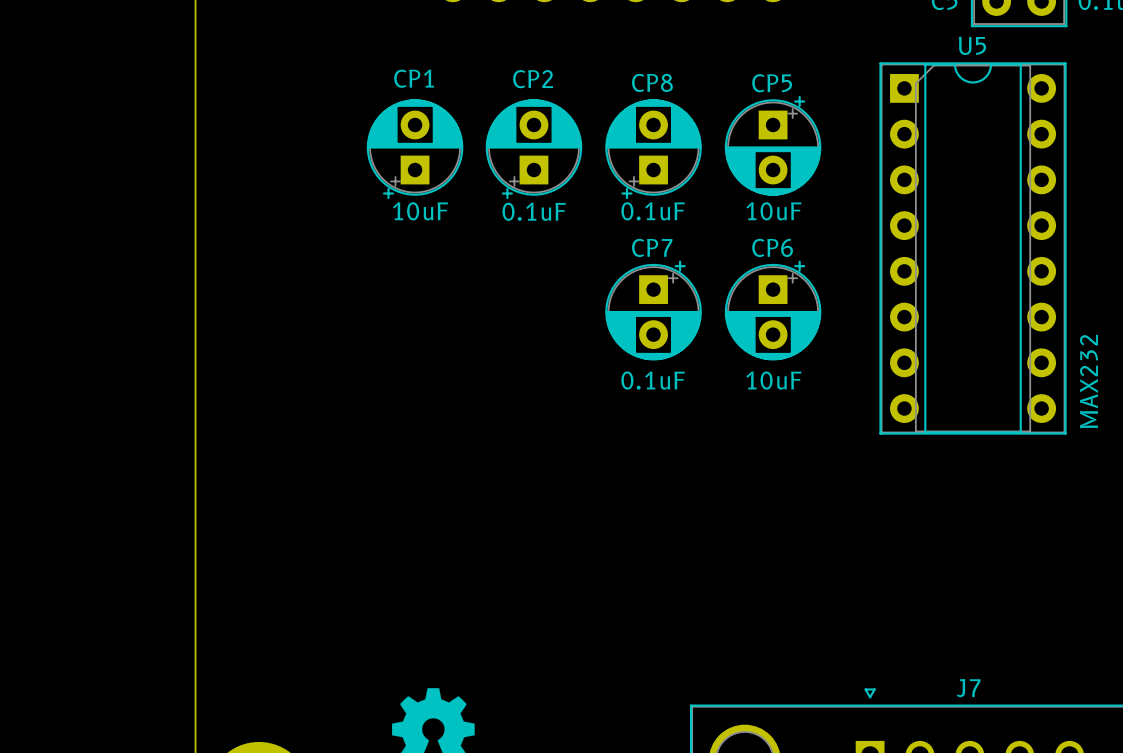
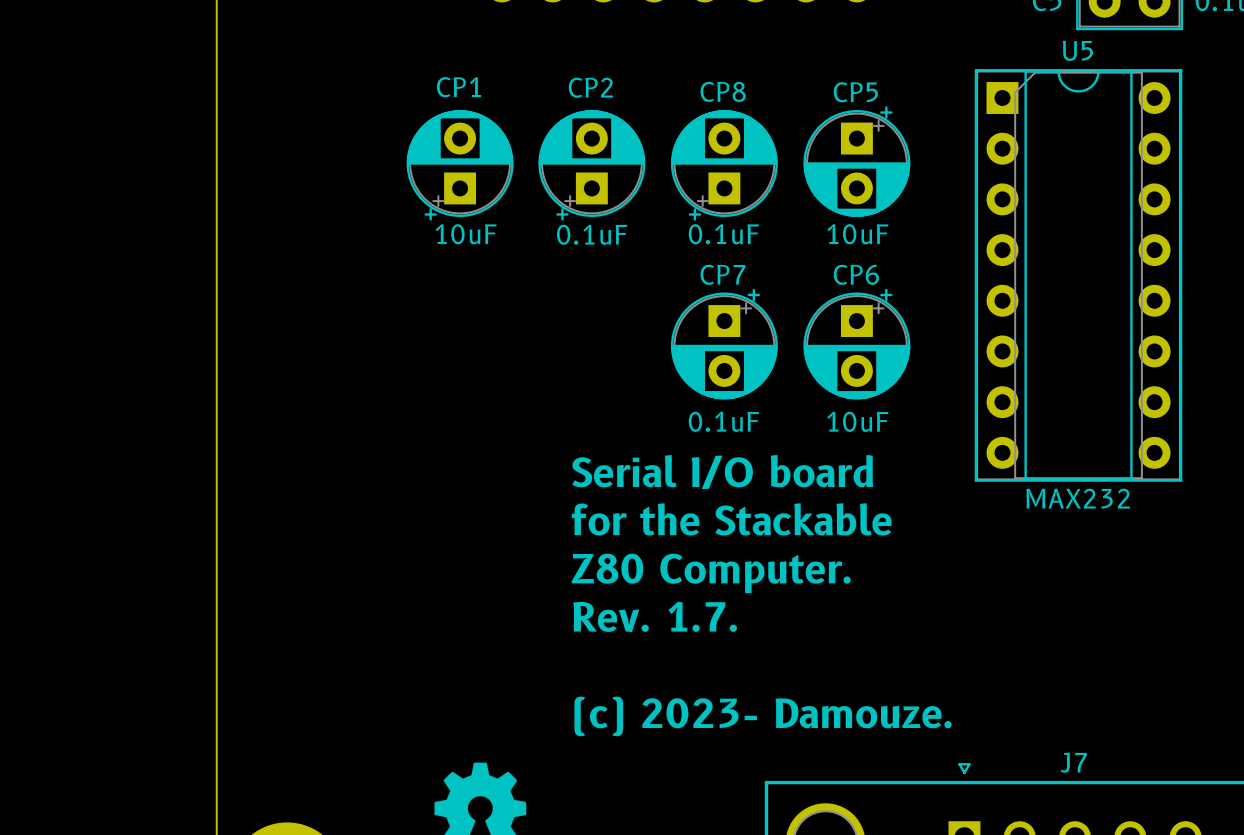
U5 value rotation: 0° (1088, 381) -> 90° clockwise (1078, 498)
U5 value position: MAX232 (1088, 381) -> MAX232 (1078, 498)
text: none -> Serial I/O board (722, 471)
text: none -> for the Stackable (731, 519)
text: none -> Z80 Computer. (711, 573)
text: none -> Rev. 1.7. (655, 616)
text: none -> (c) 2023- Damouze. (763, 716)

